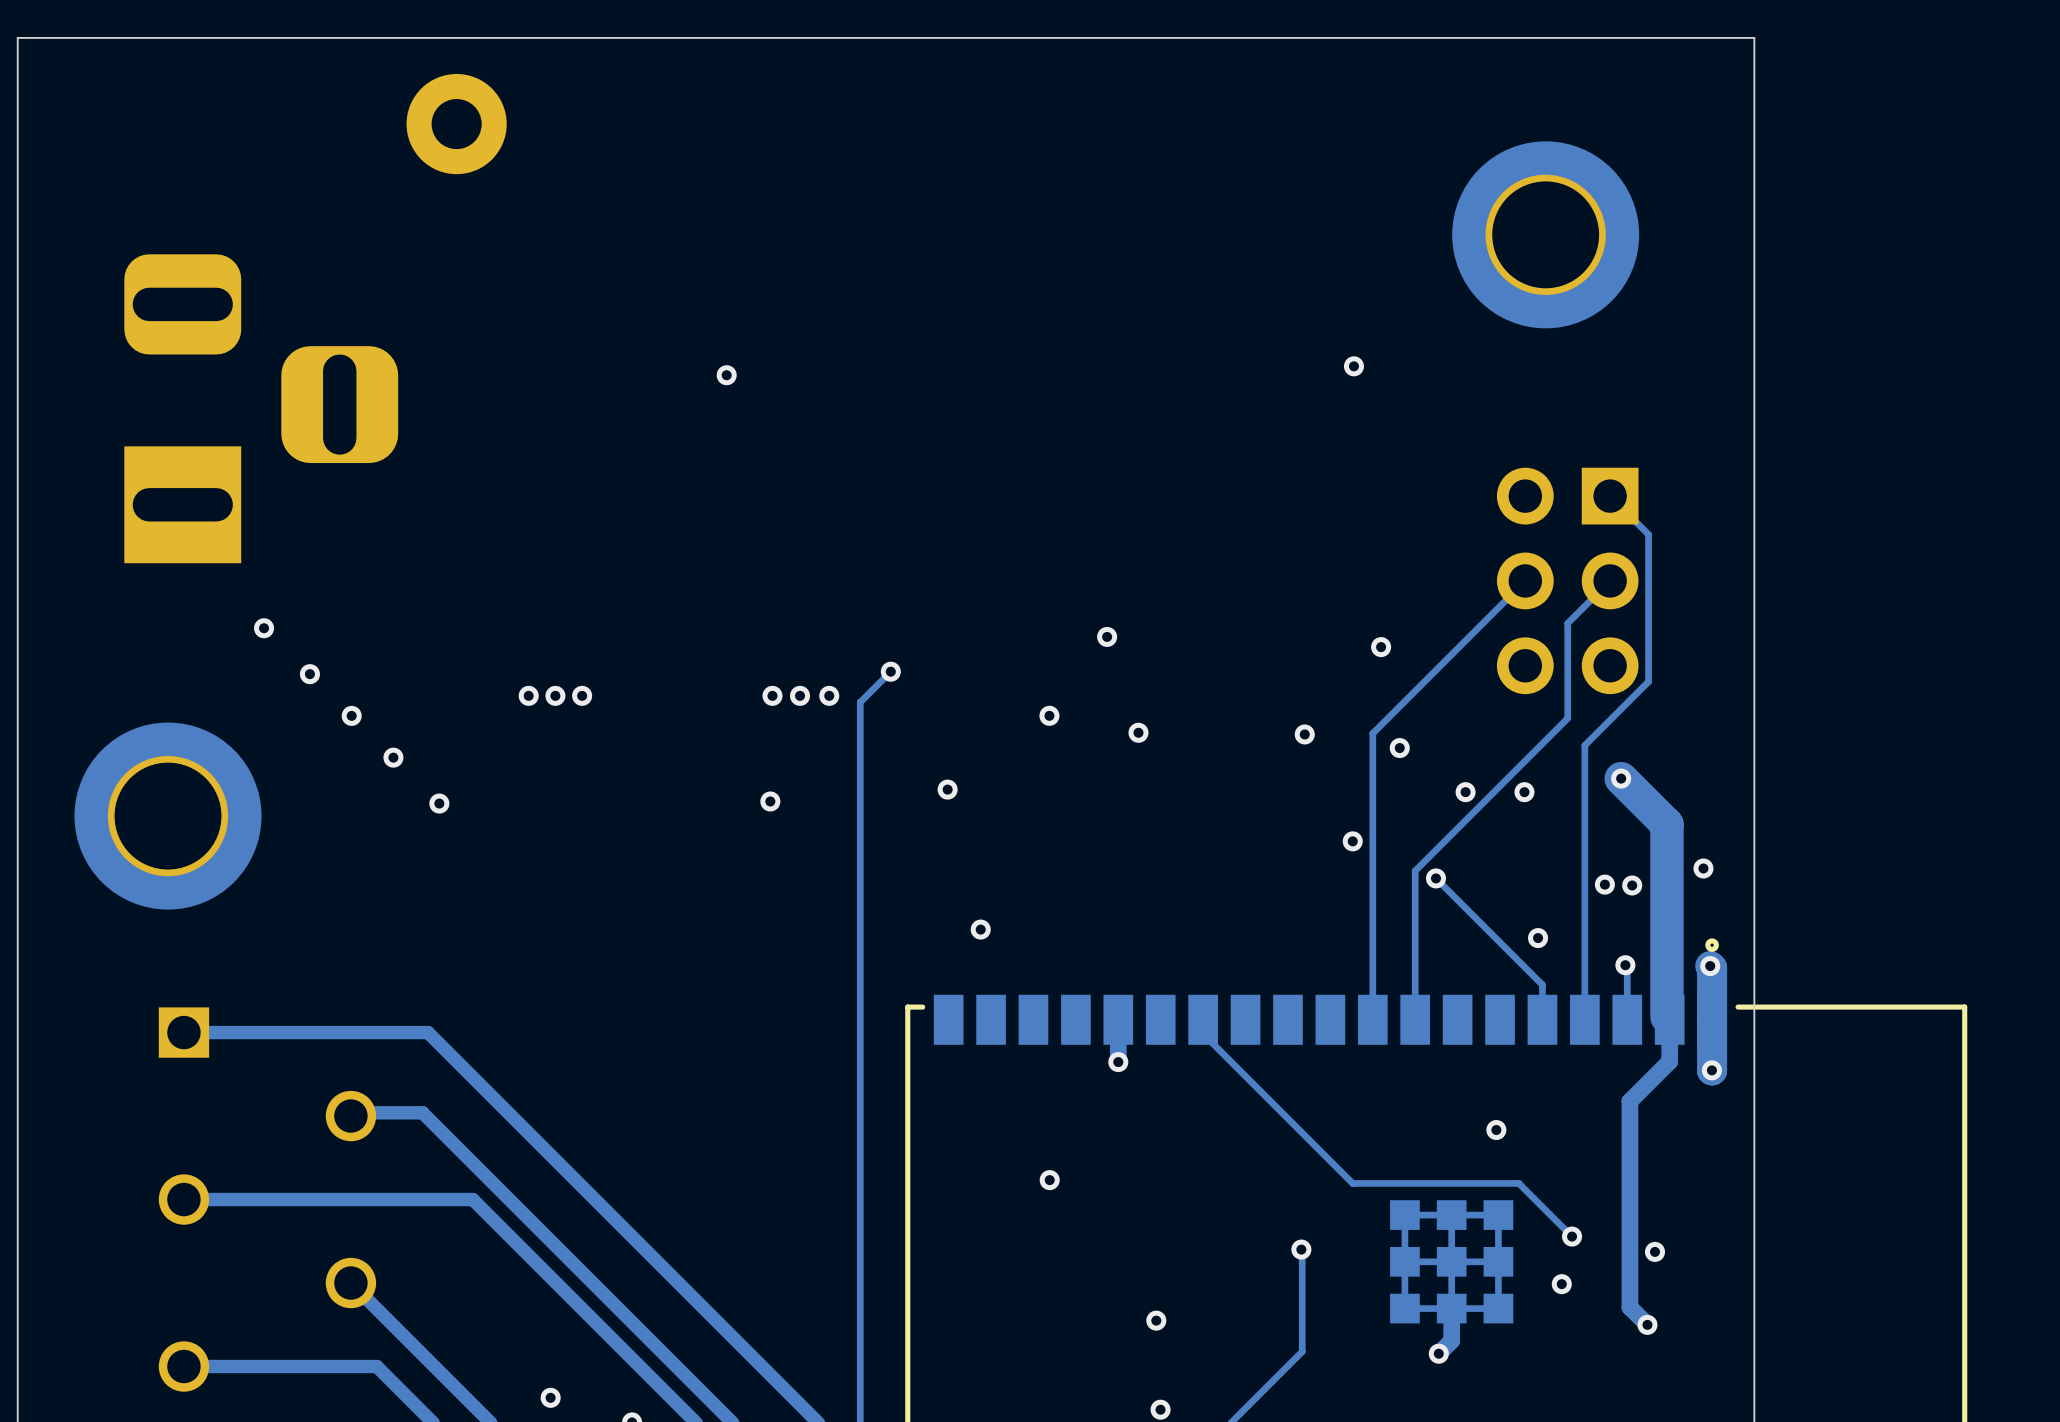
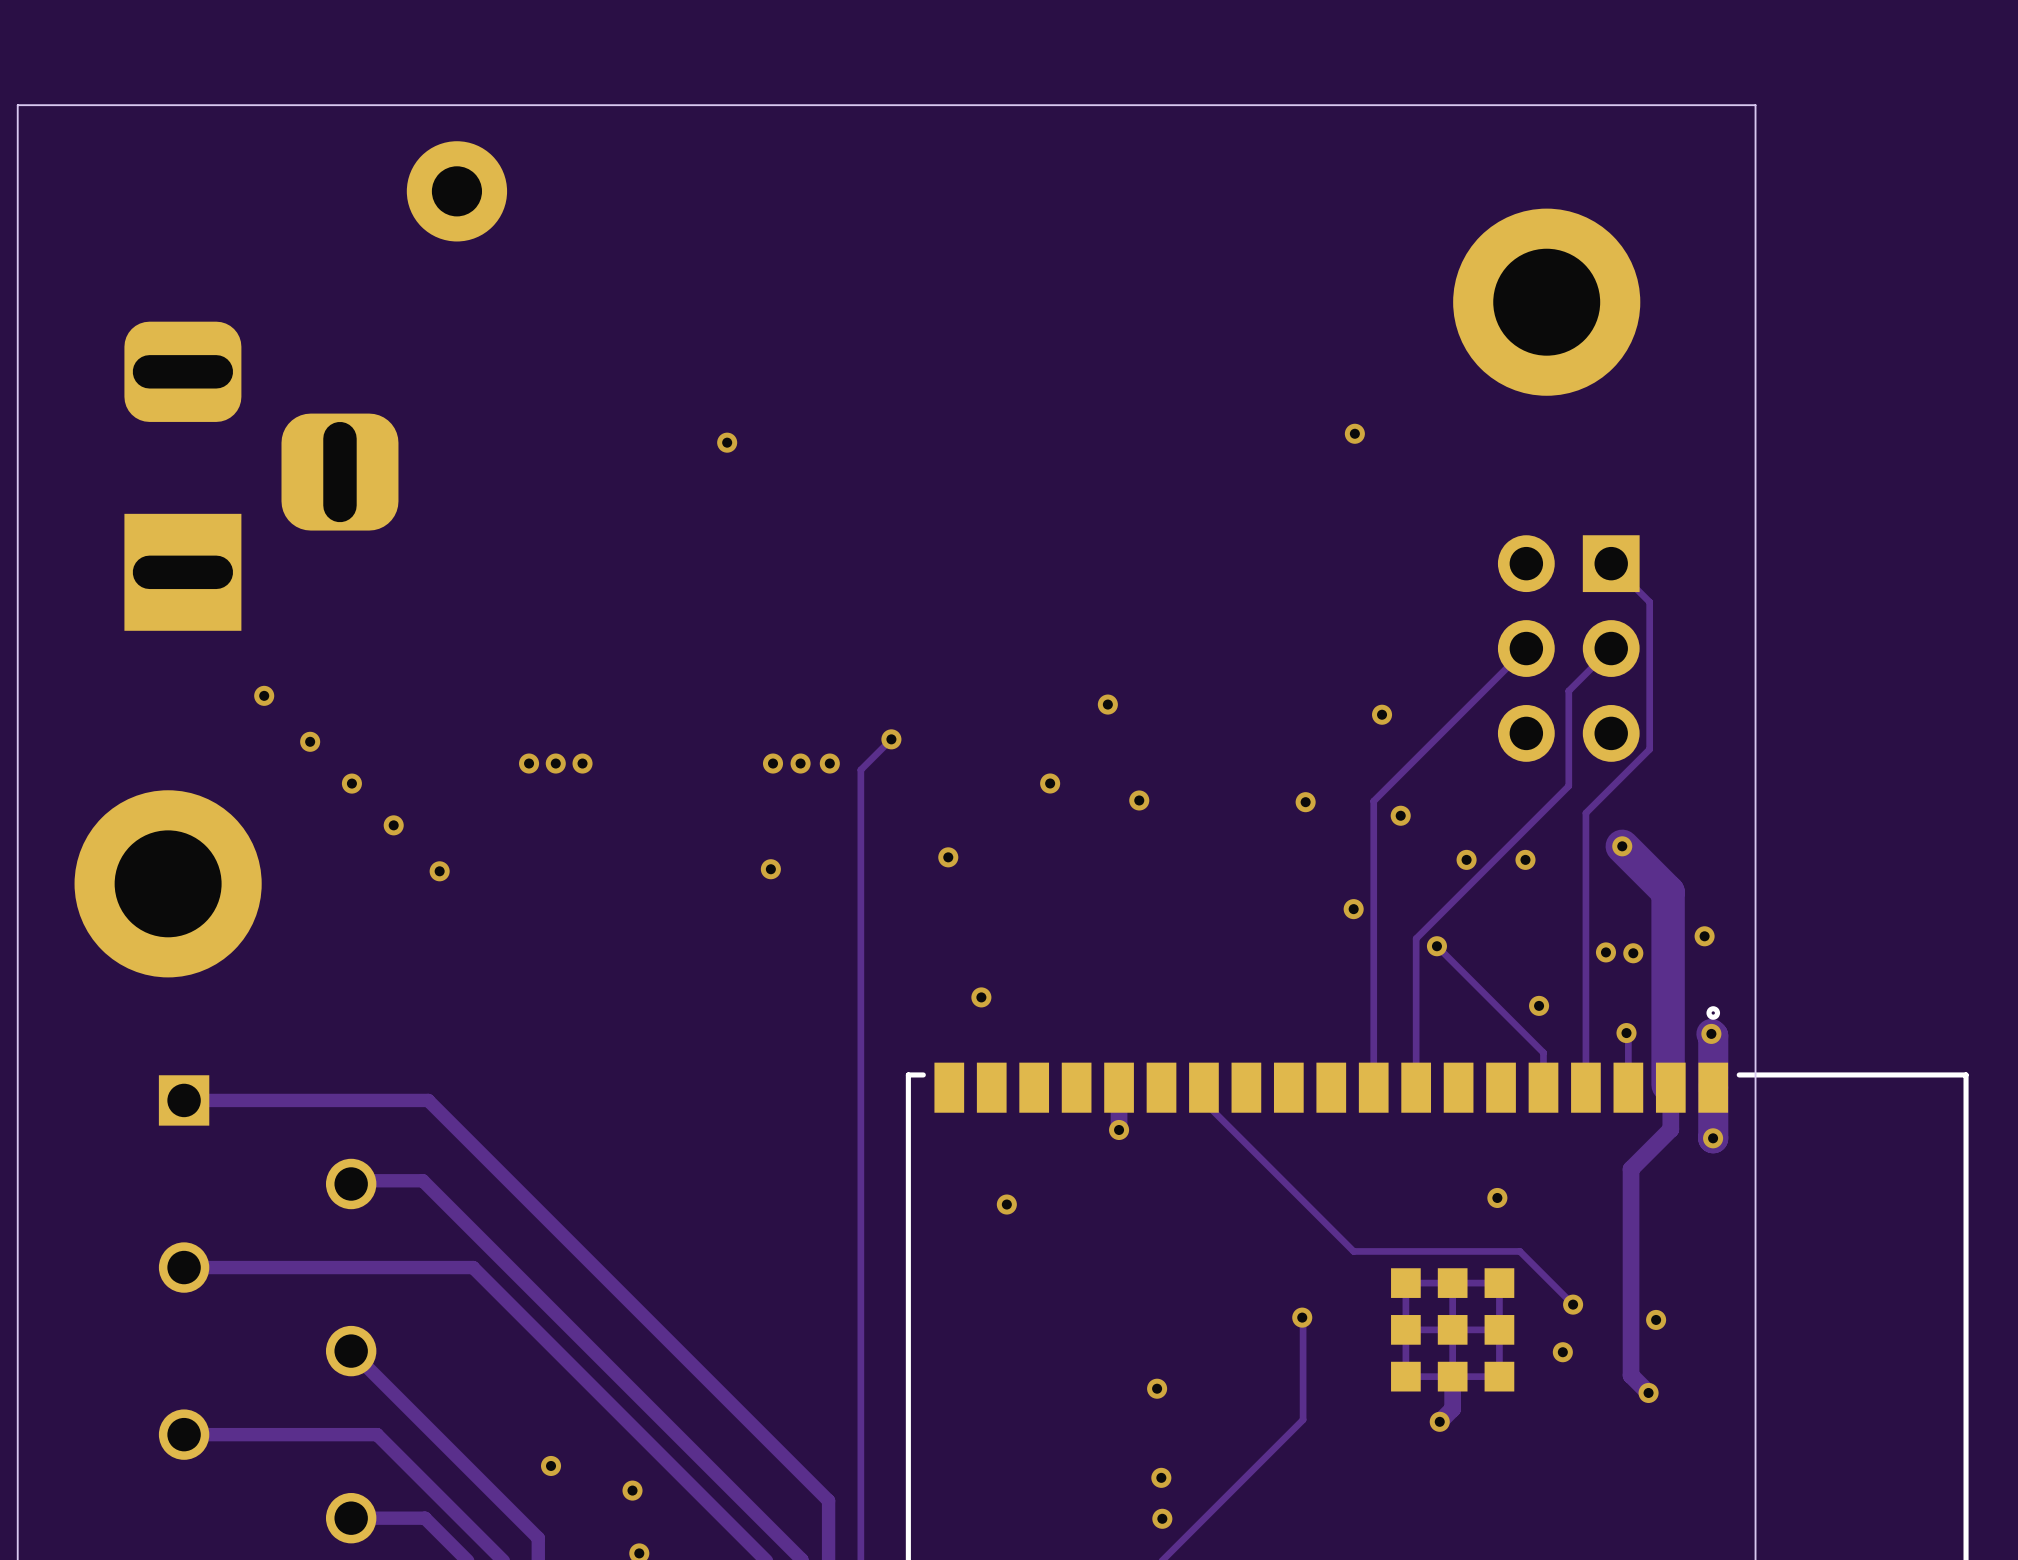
via position: (1049, 1180) -> (1006, 1204)

